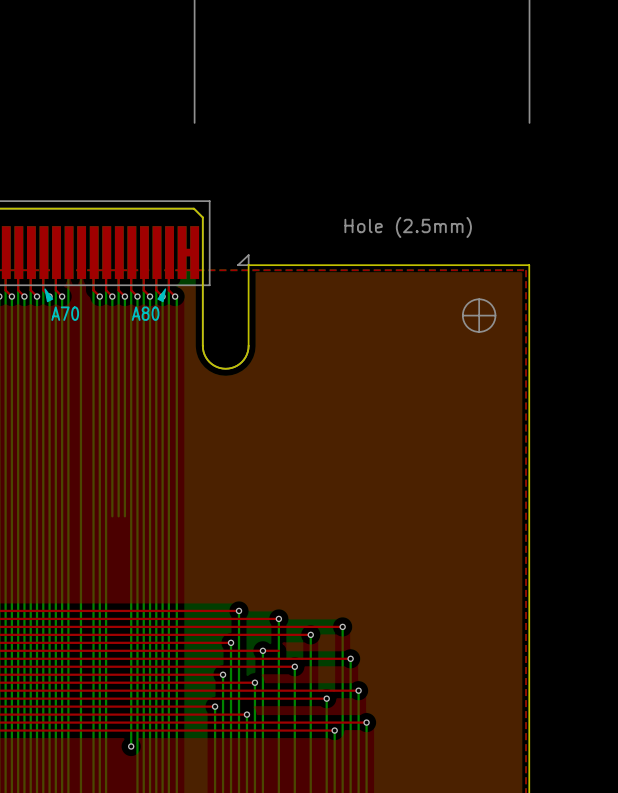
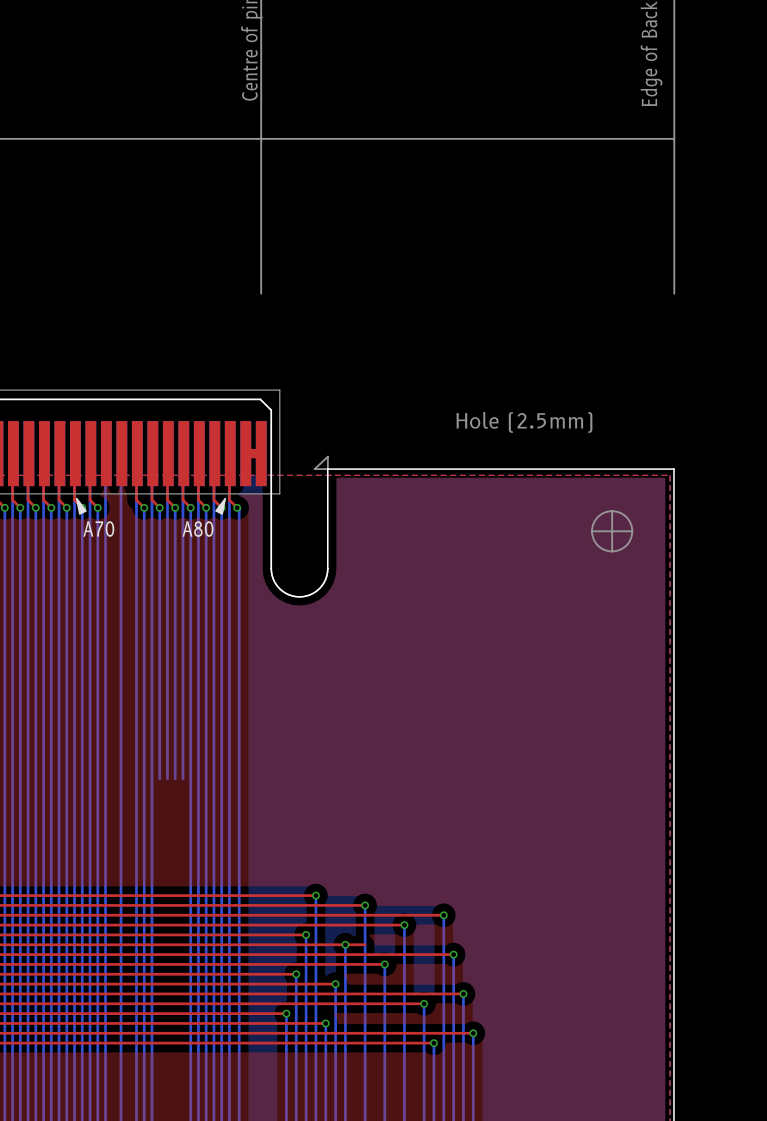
bottom track: (131, 516) (131, 746) -> none
via: (131, 746) -> none

